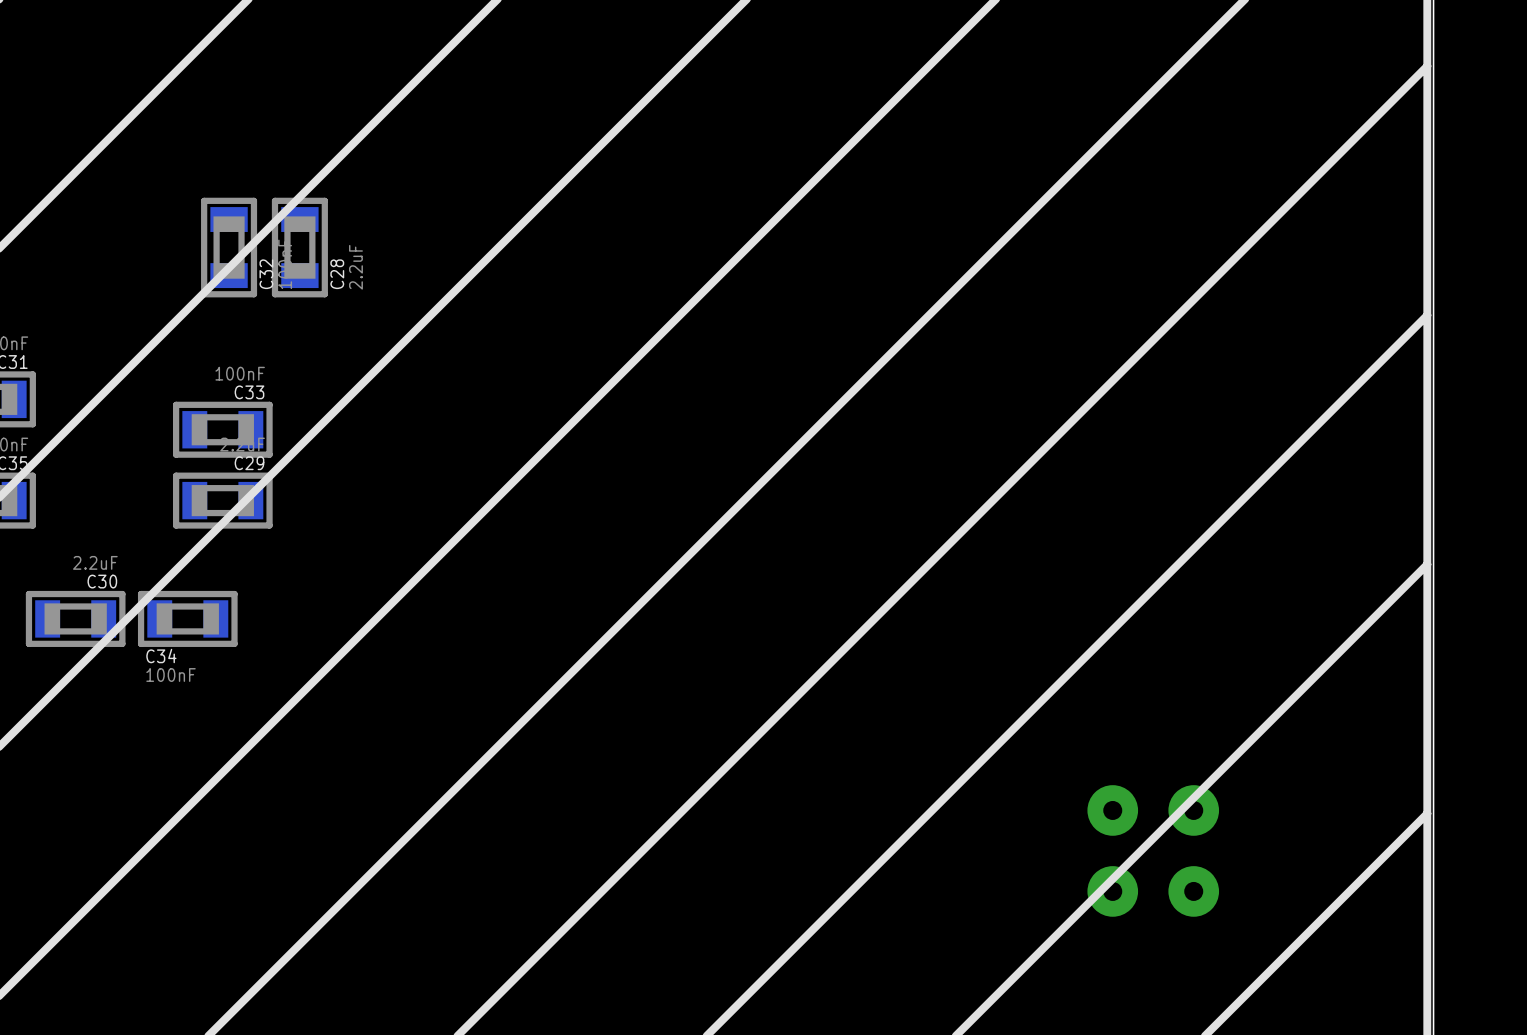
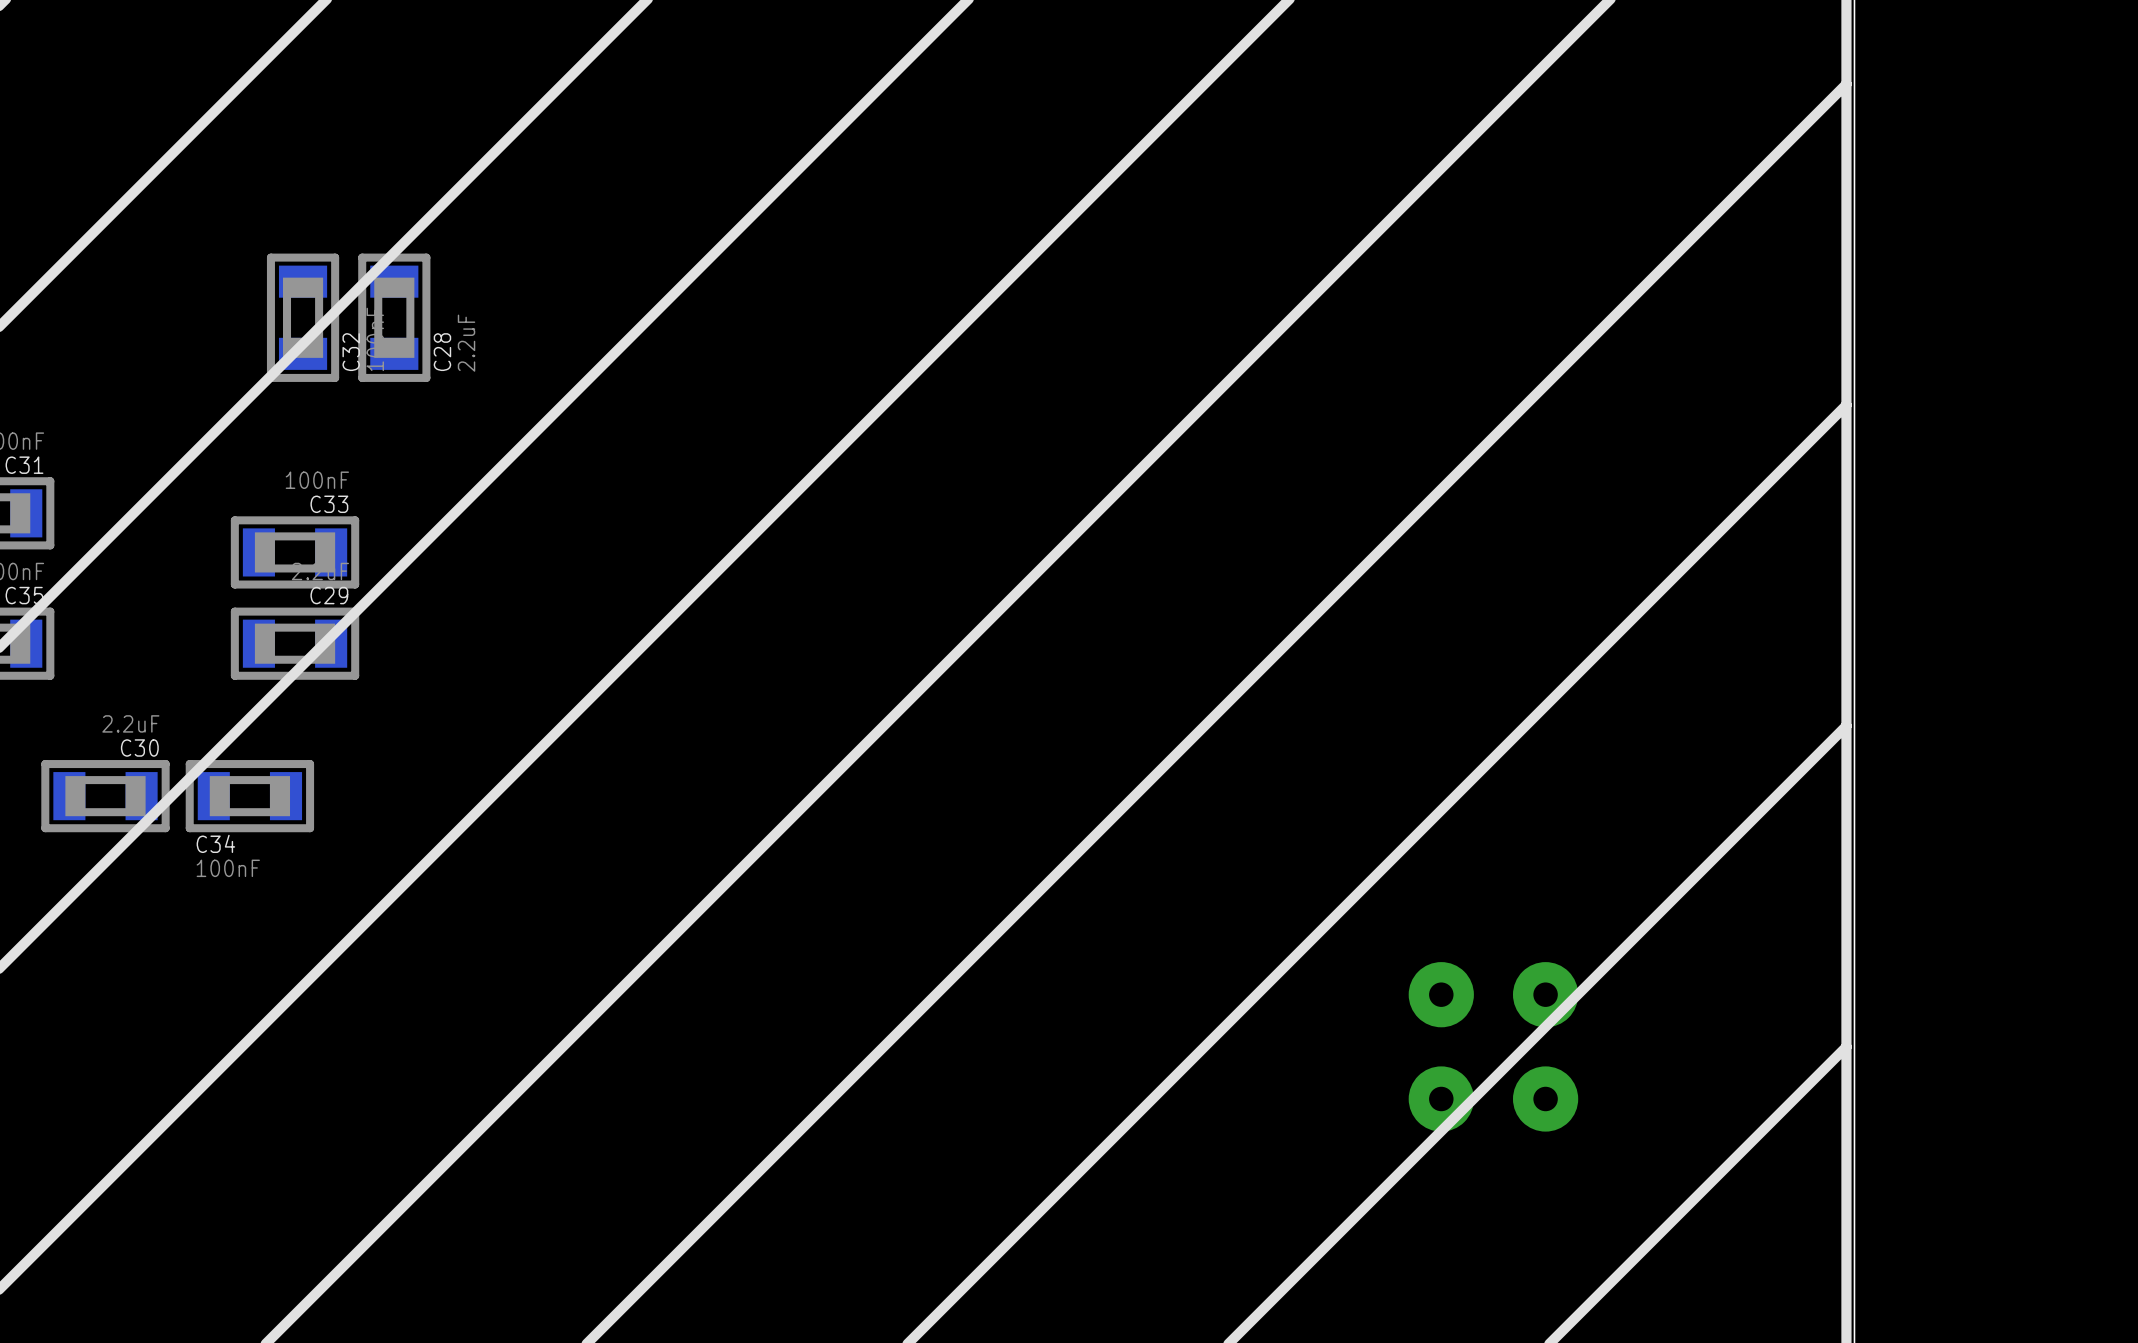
part position: (1153, 850) -> (1493, 1046)

